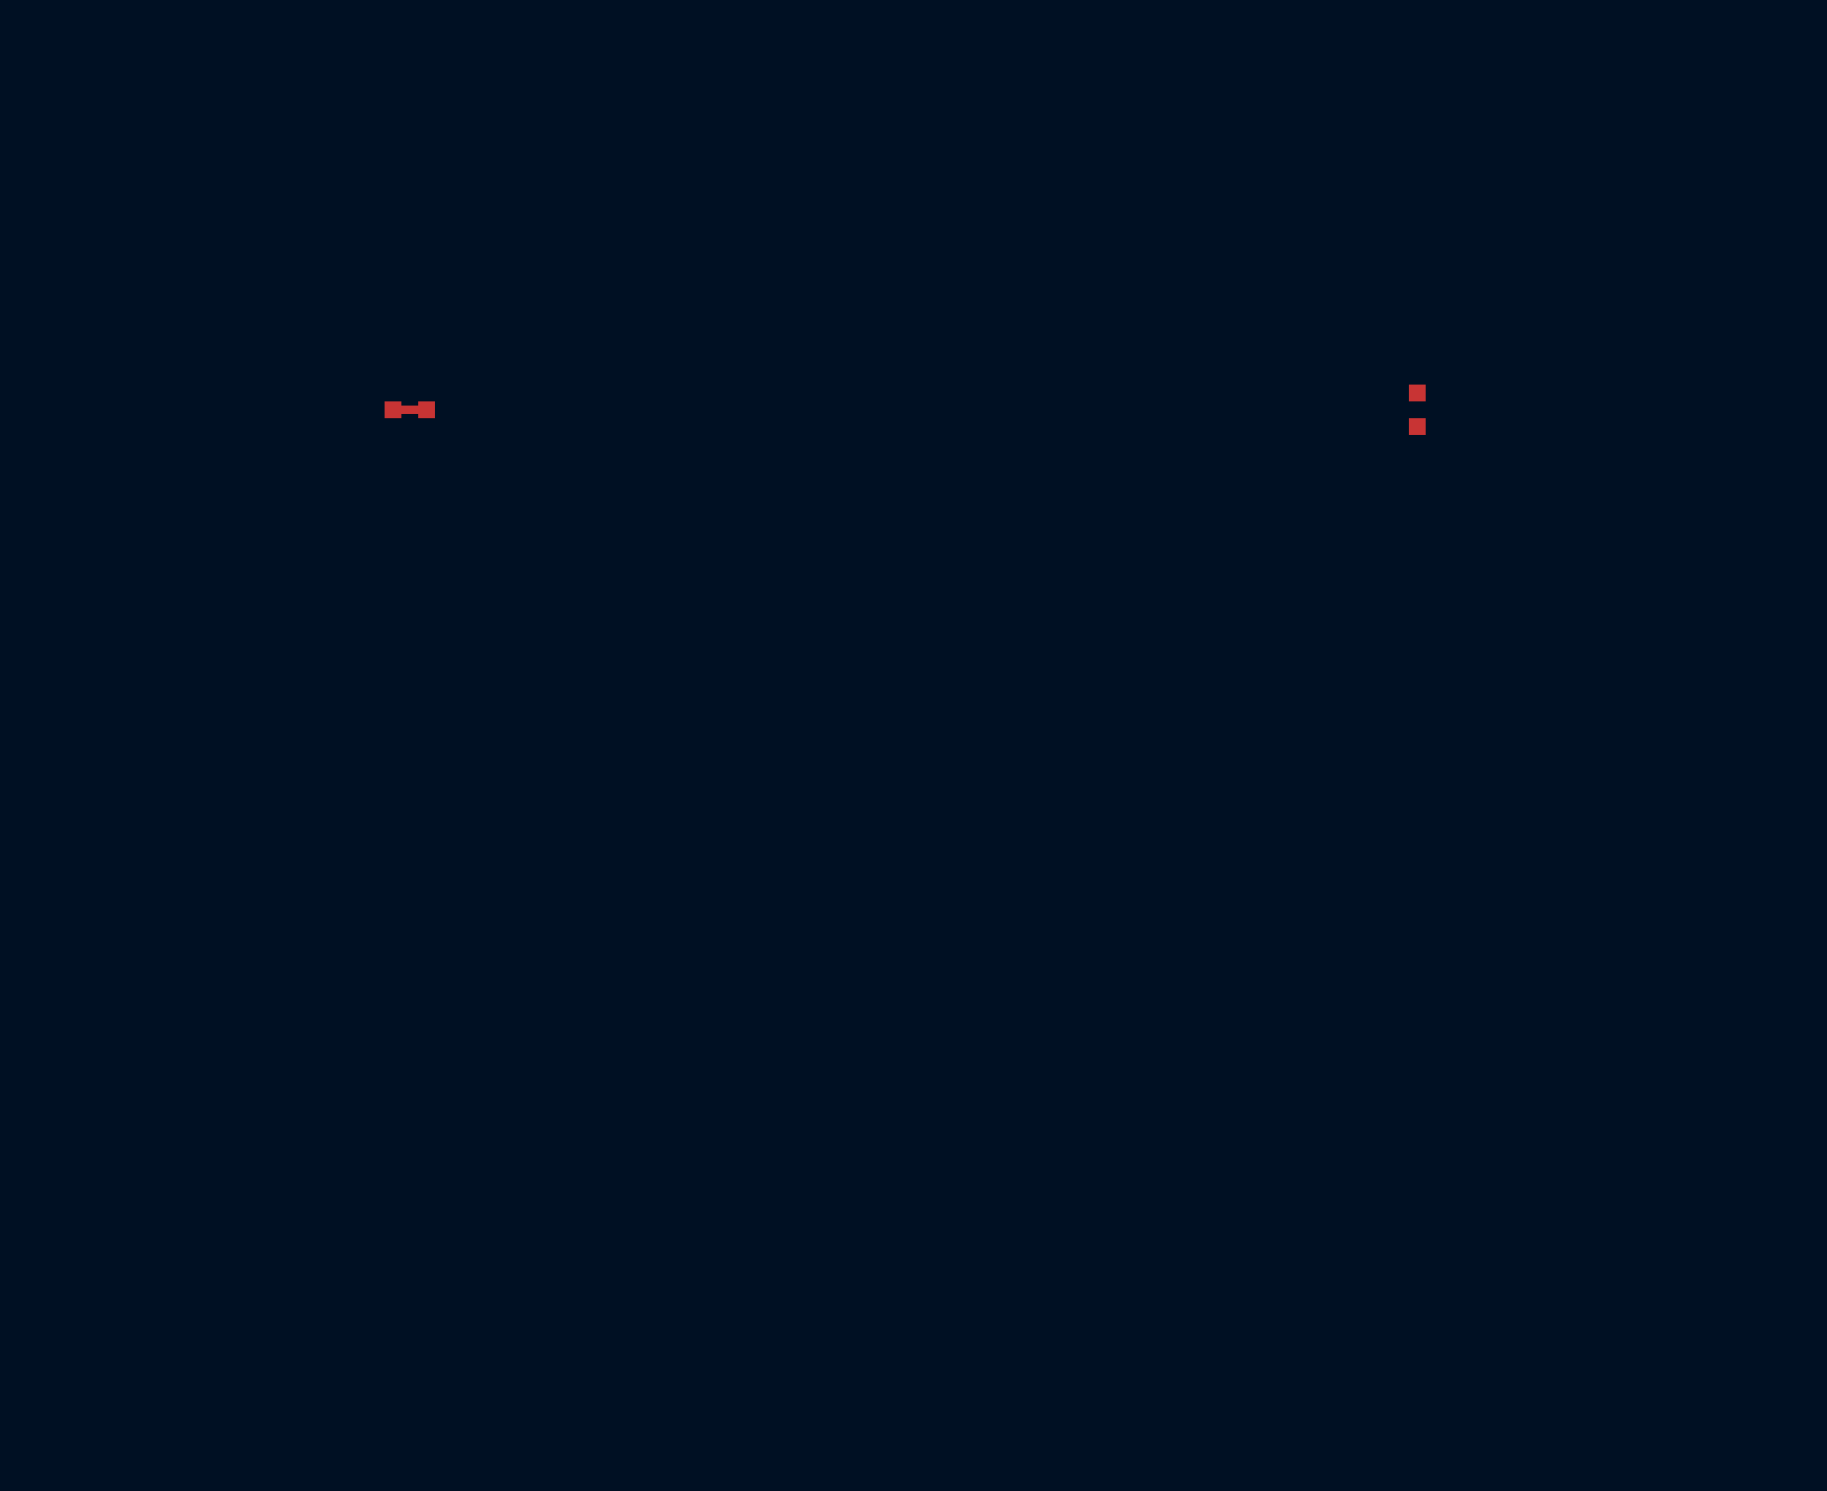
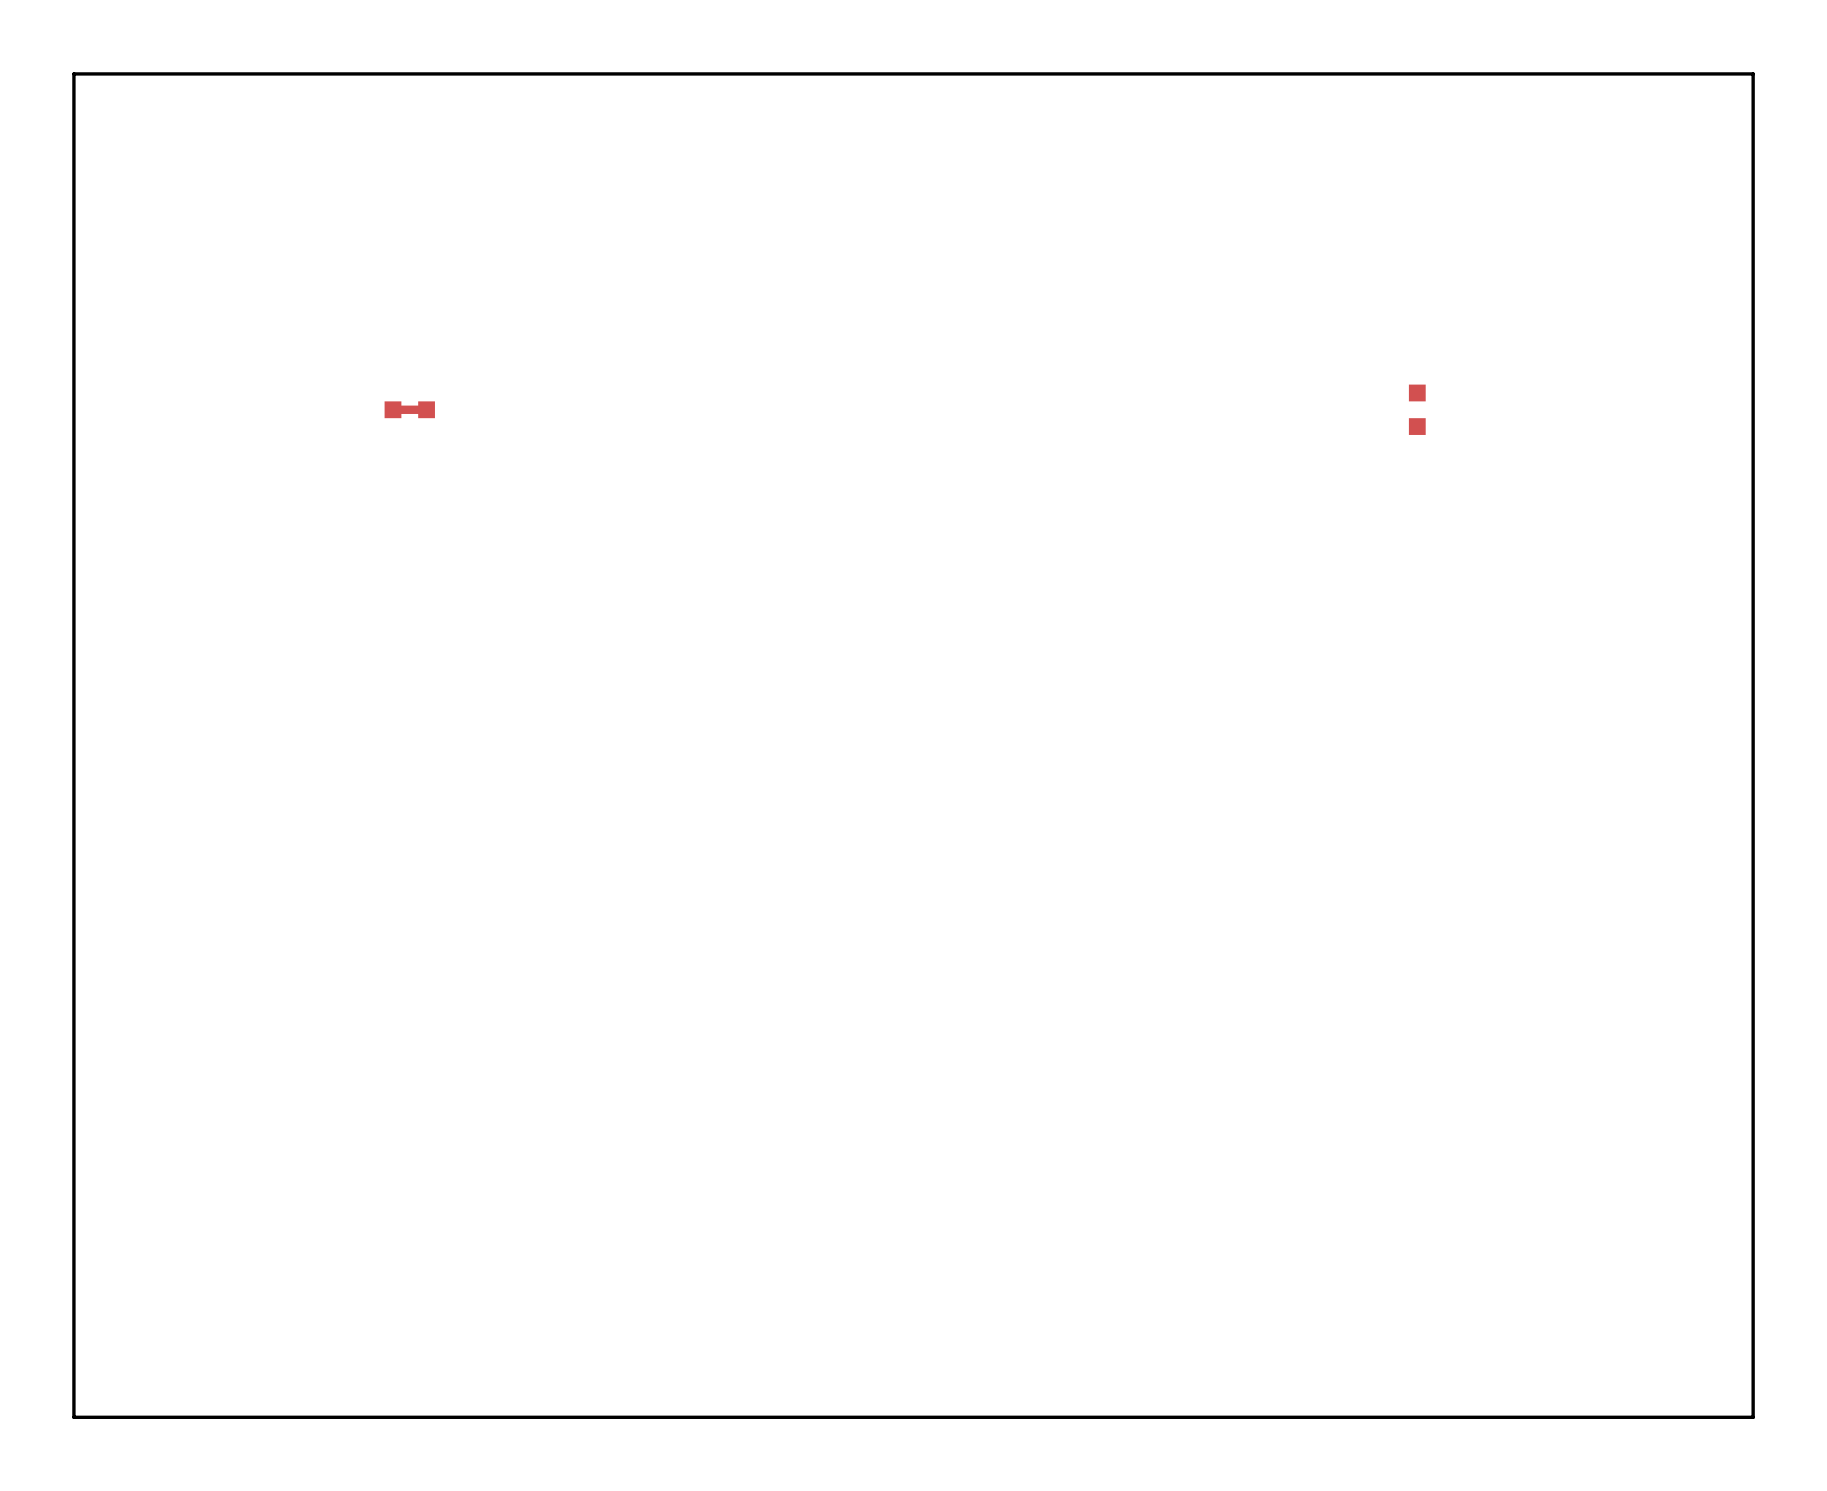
board edge: none -> (73, 73) (1753, 73) (1753, 1417) (73, 1417) (73, 73)

